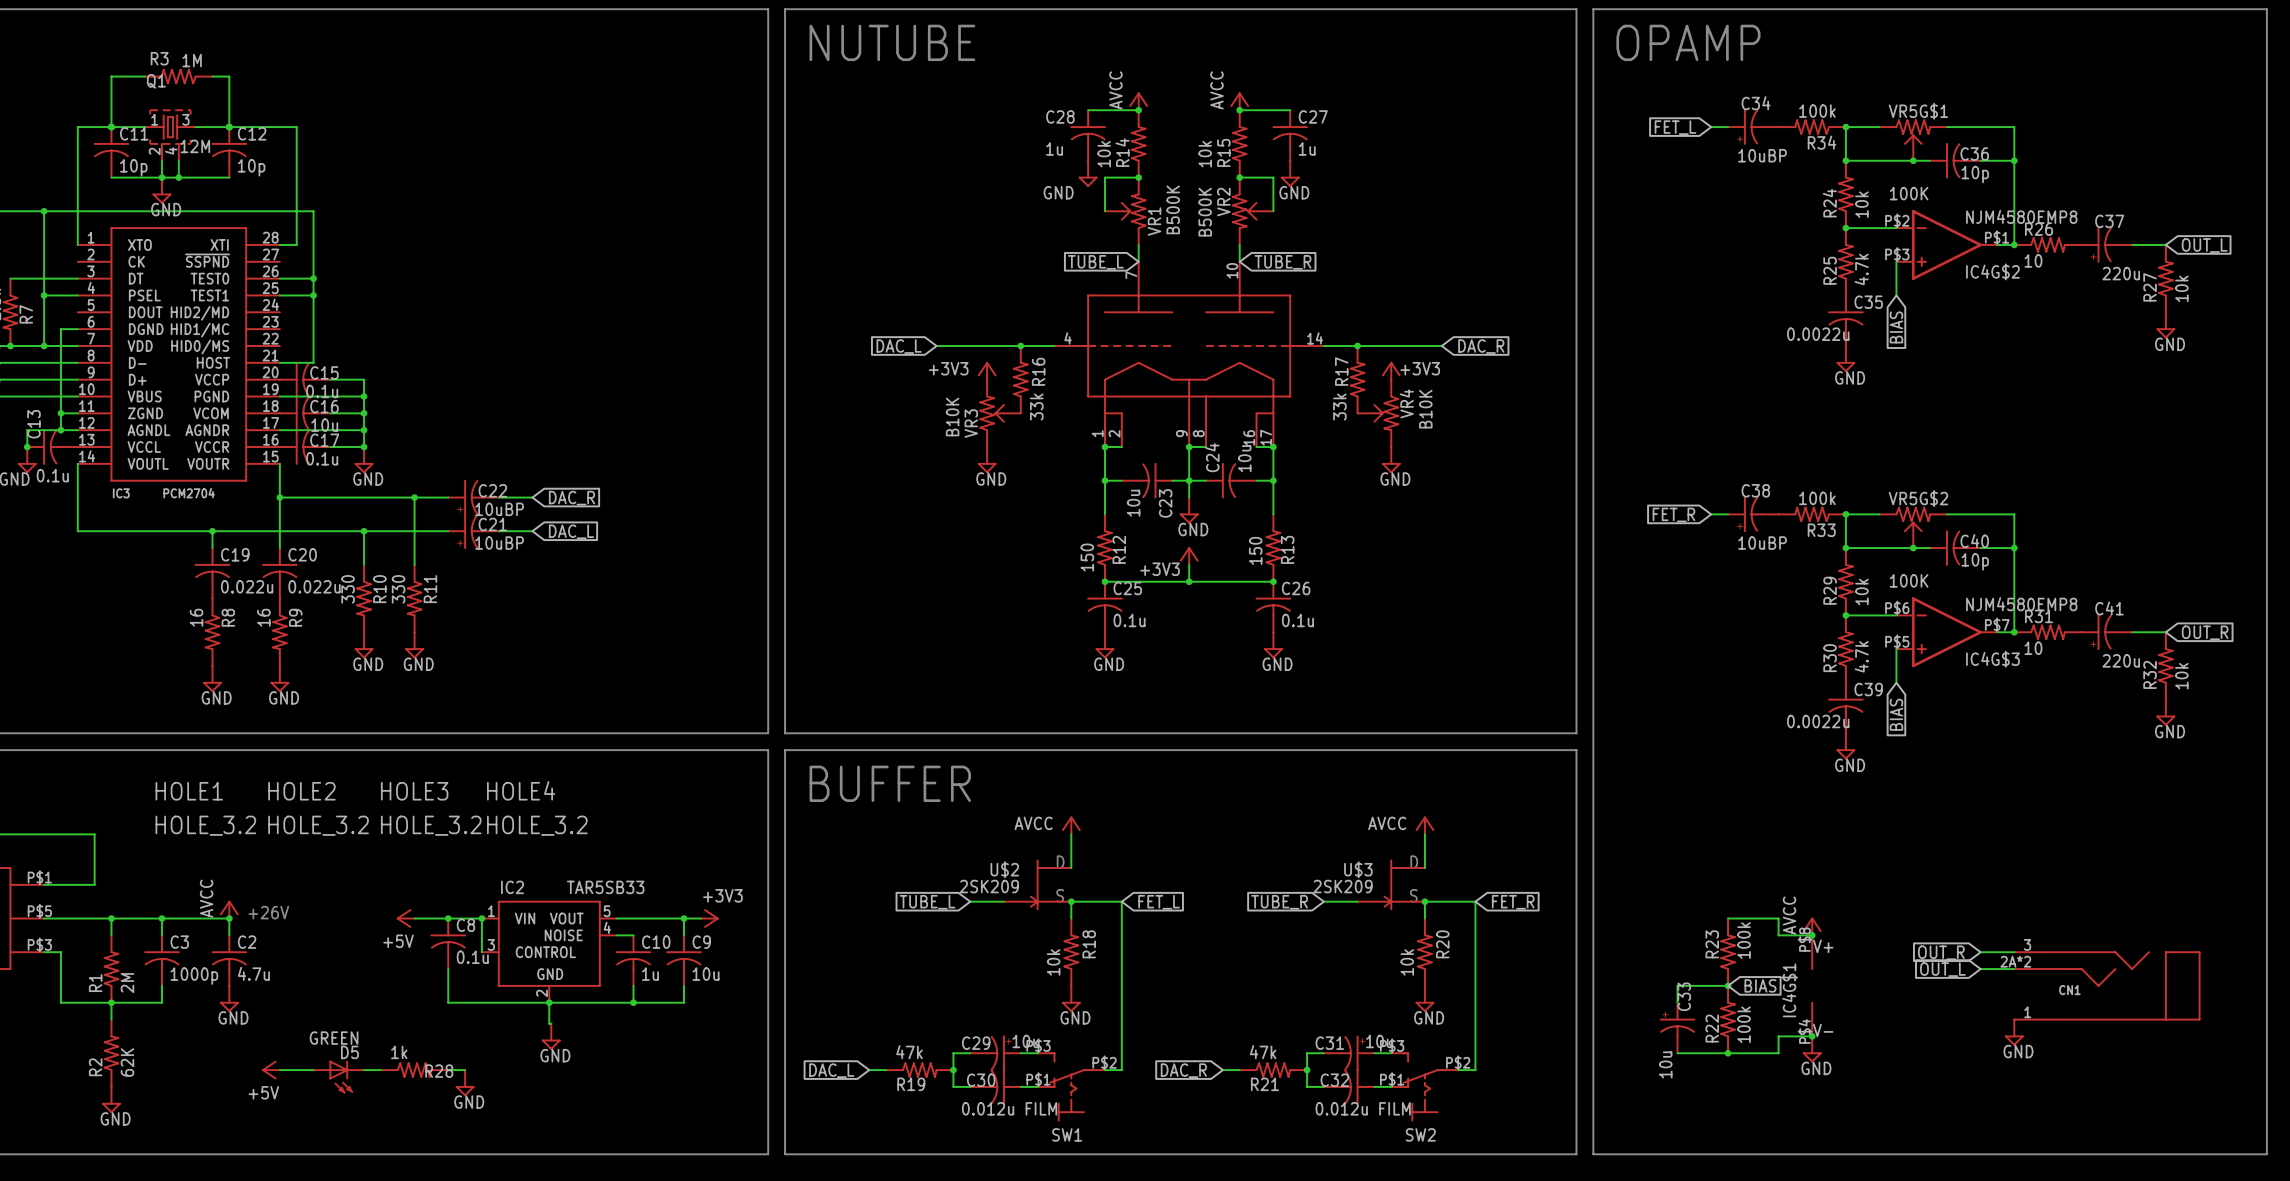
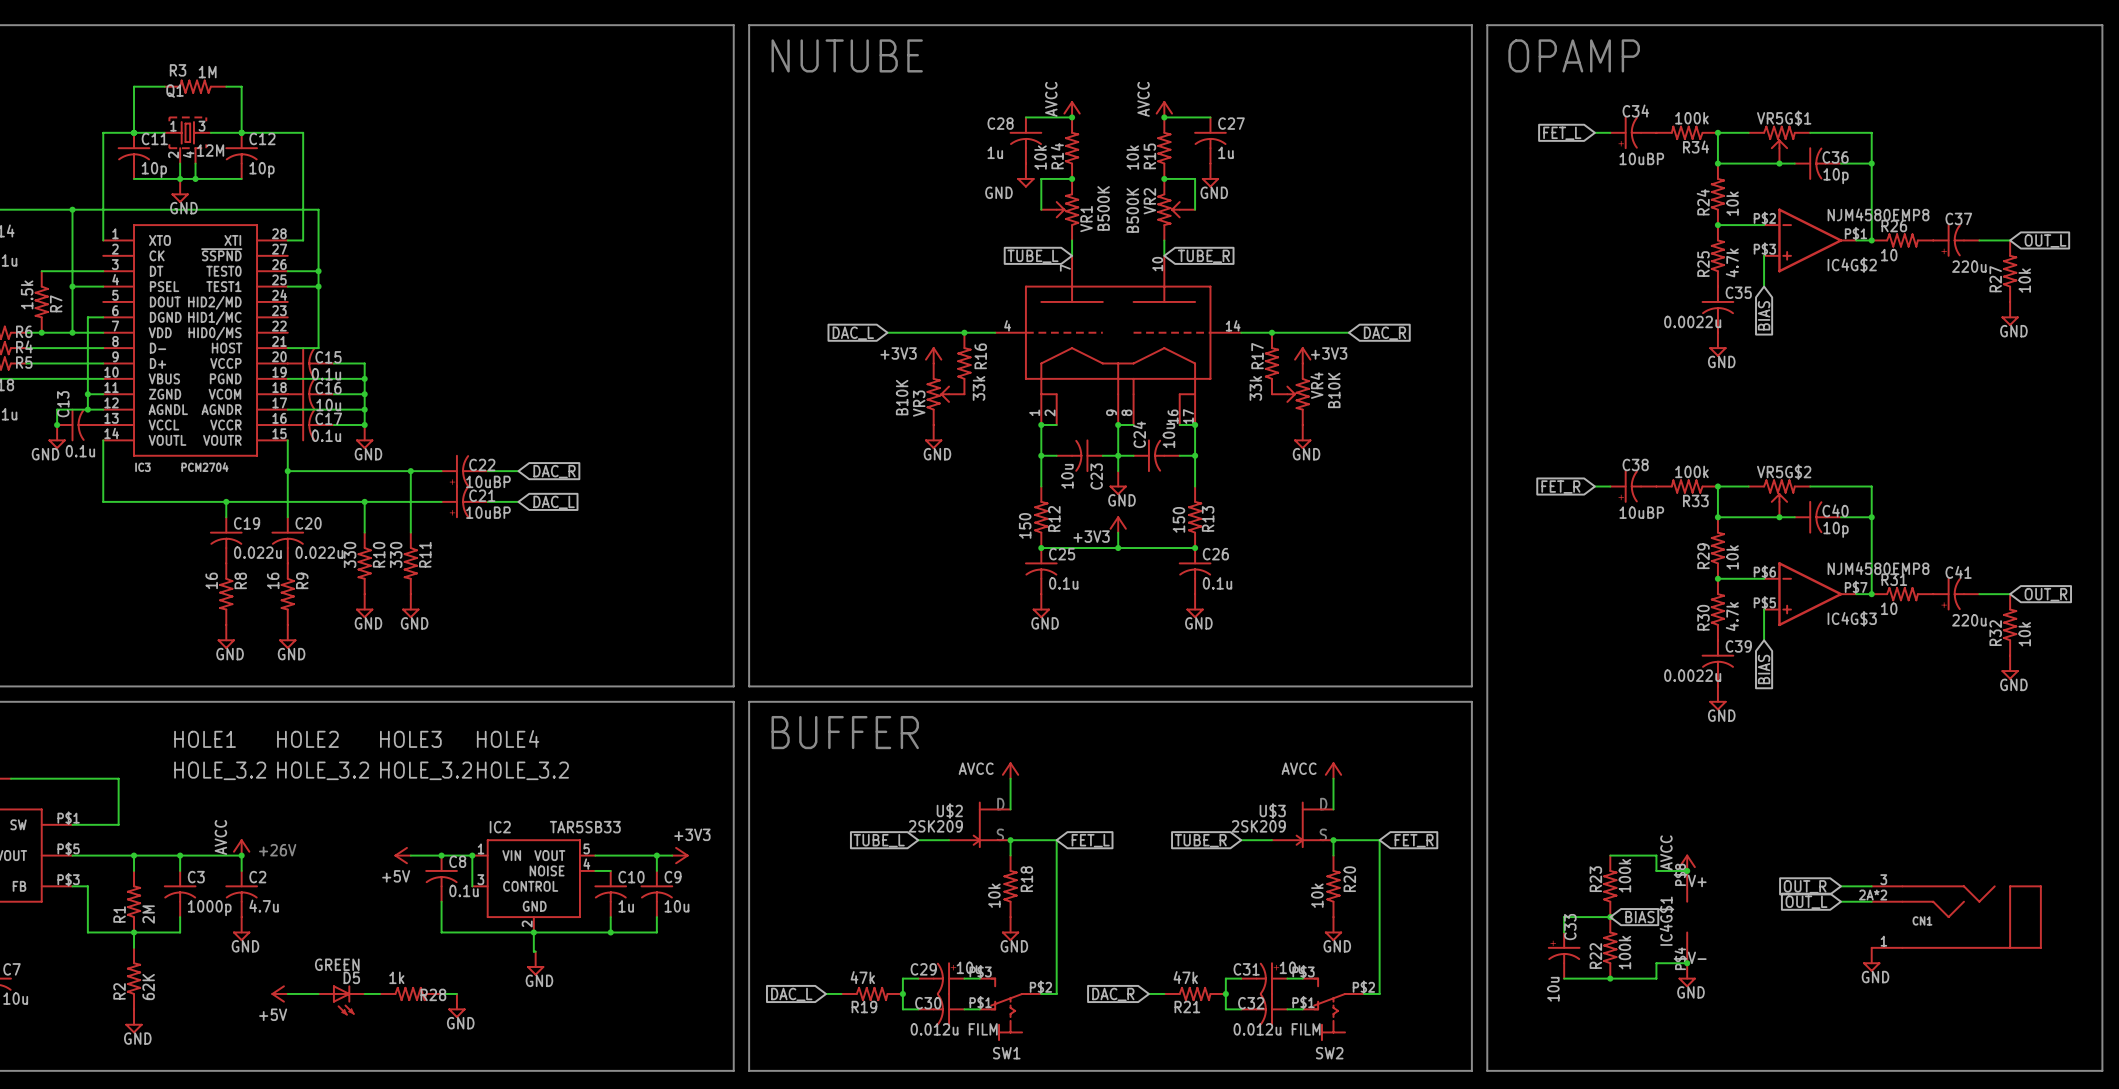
VR5G$1 value: 100K (1909, 193) -> none
VR5G$2 value: 100K (1909, 580) -> none

